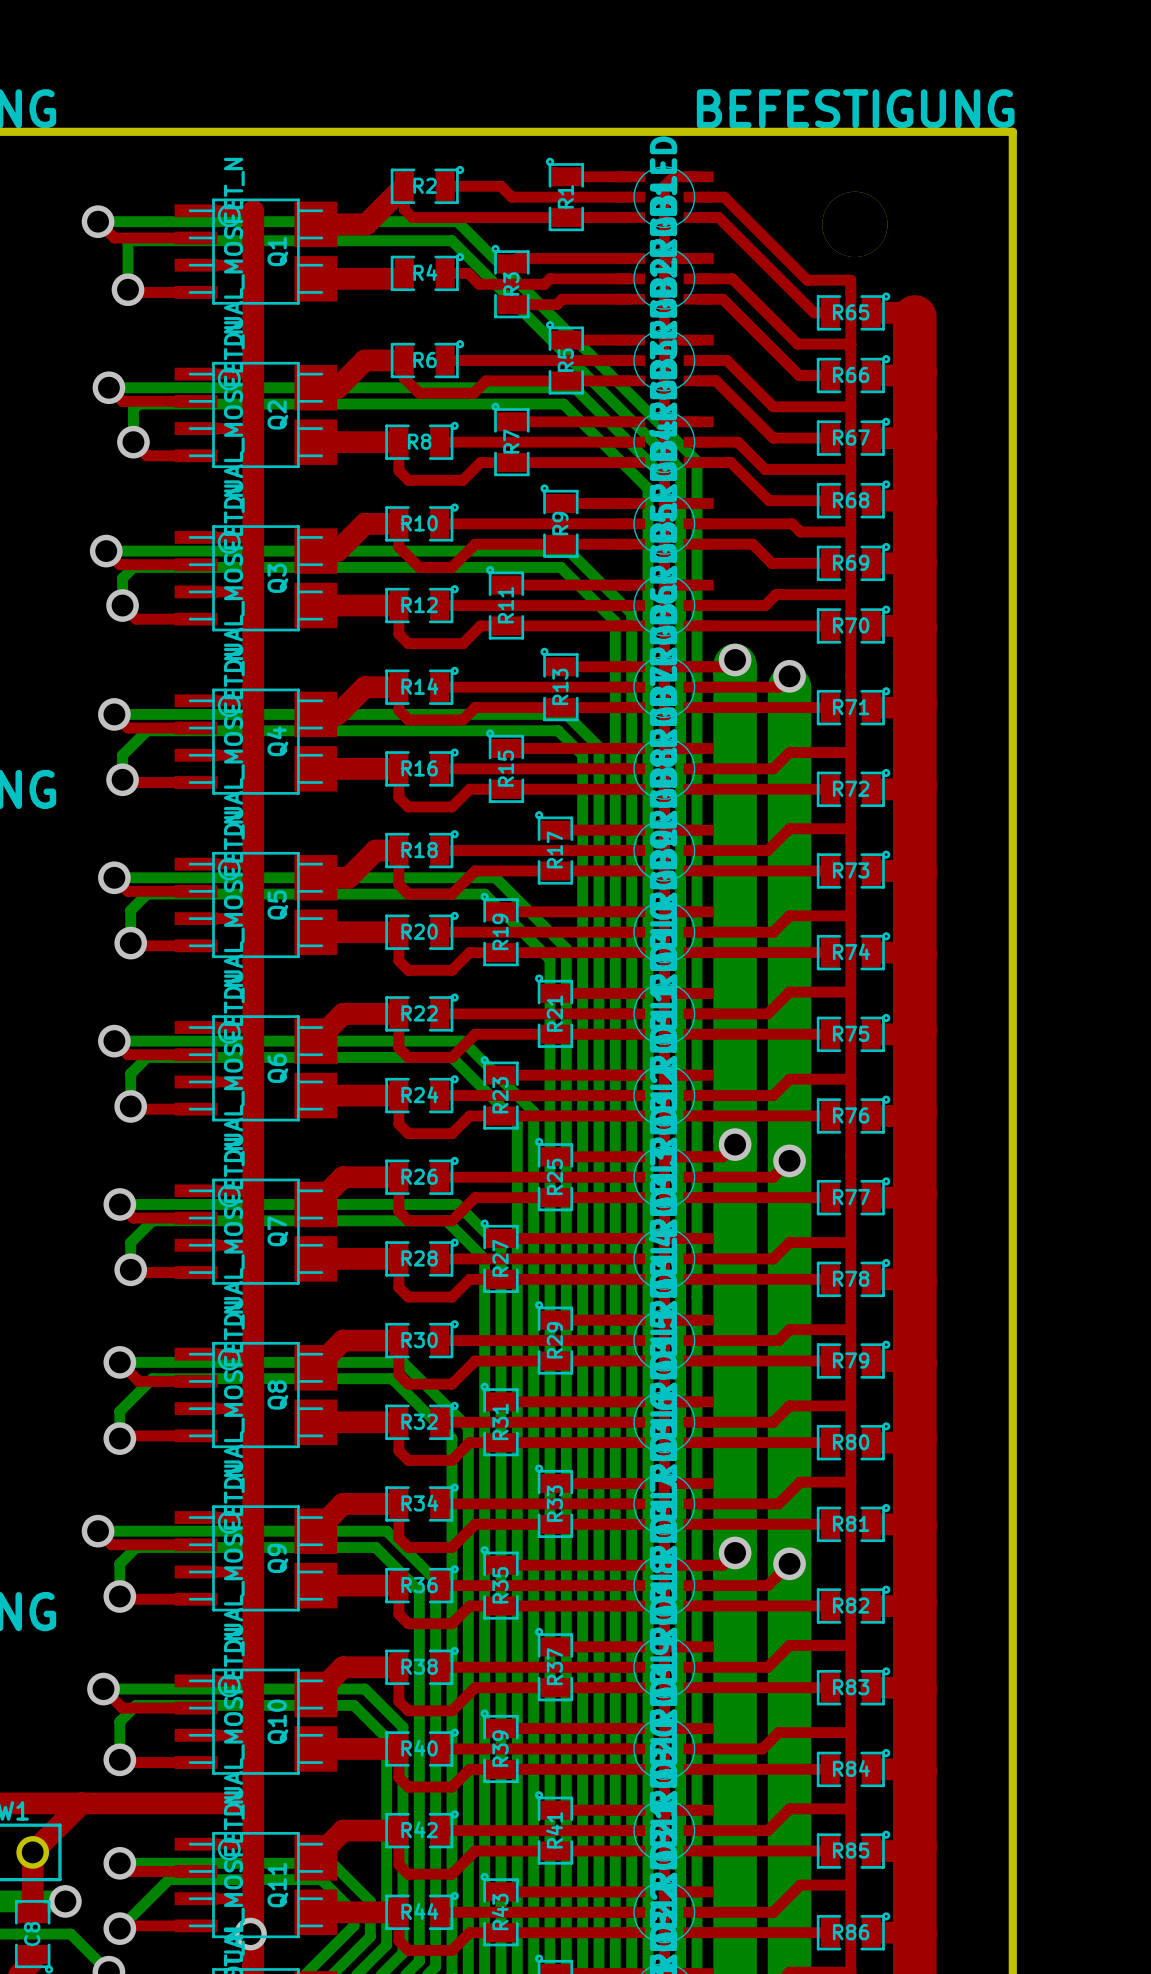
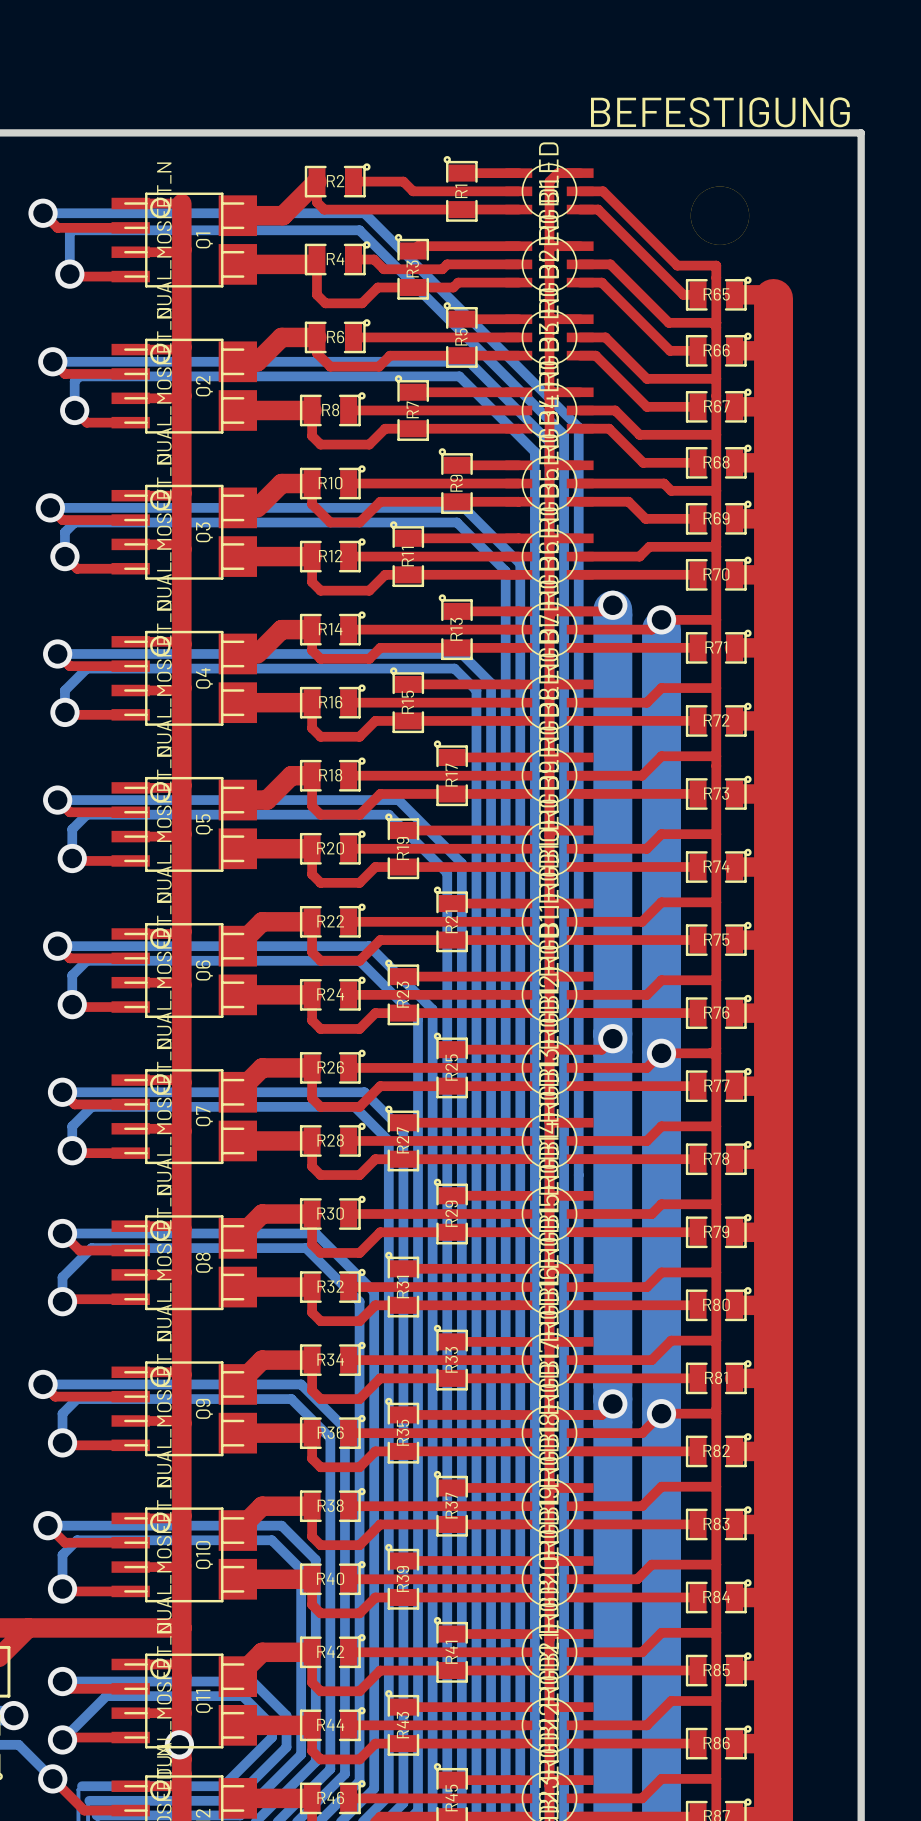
top track: none -> (316, 259) (316, 294) (325, 303) (362, 303) (377, 287) (413, 287)
top track: none -> (661, 619) (716, 619)
top track: none -> (661, 1053) (716, 1053)
top track: none -> (716, 1411) (716, 1413) (661, 1413)

